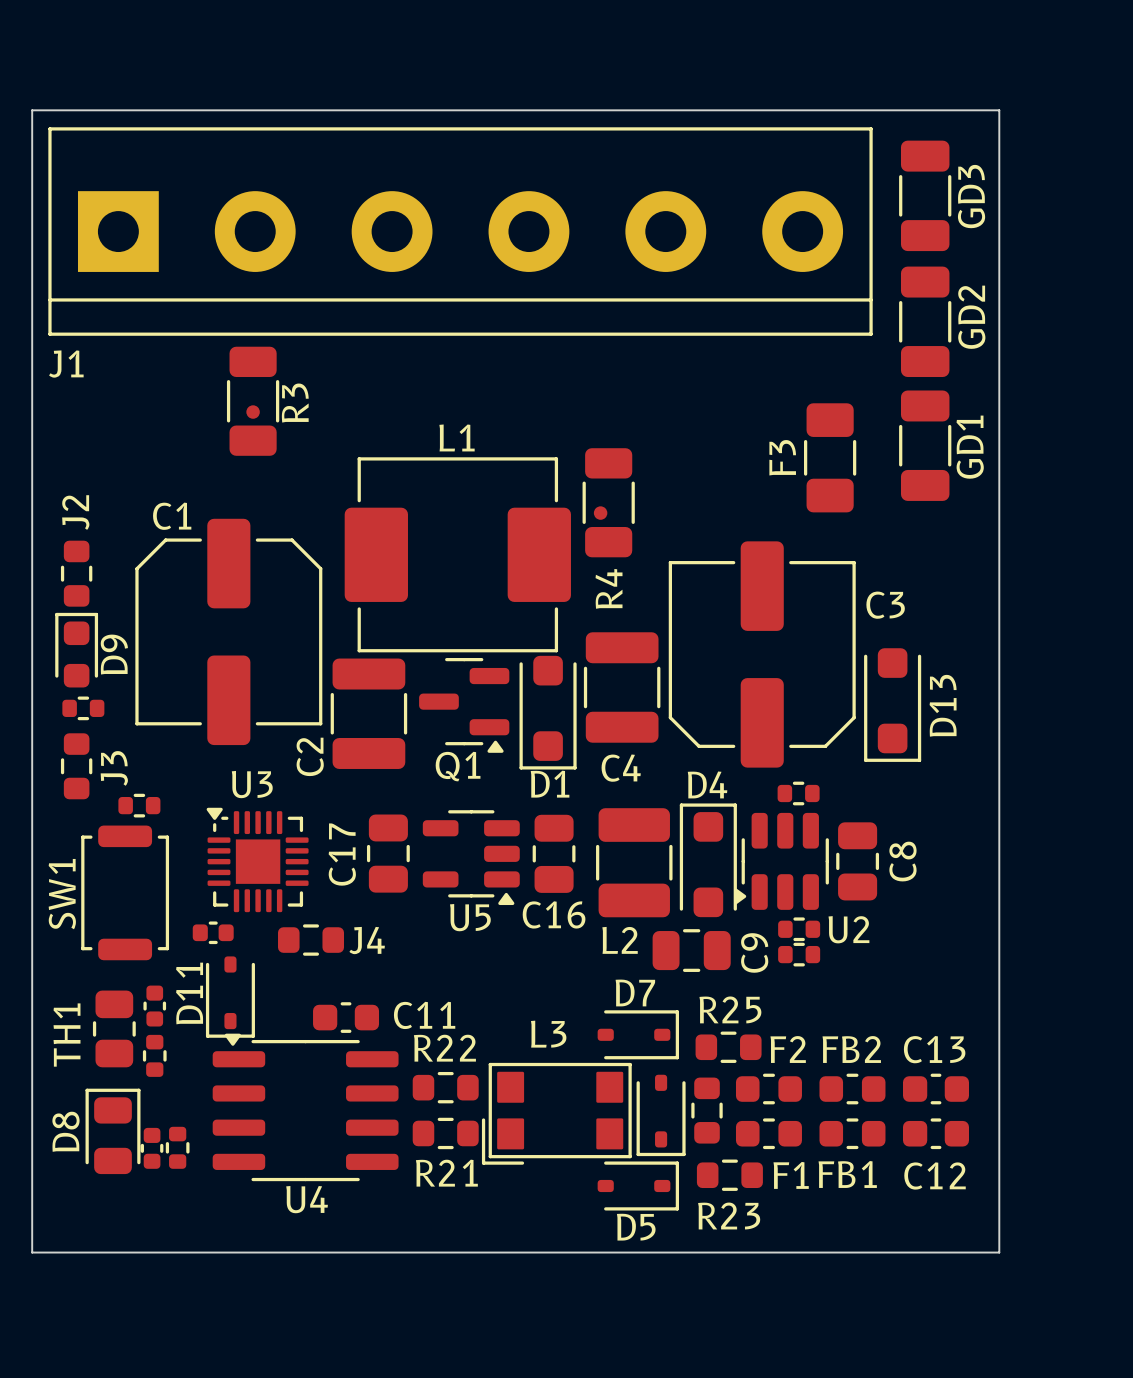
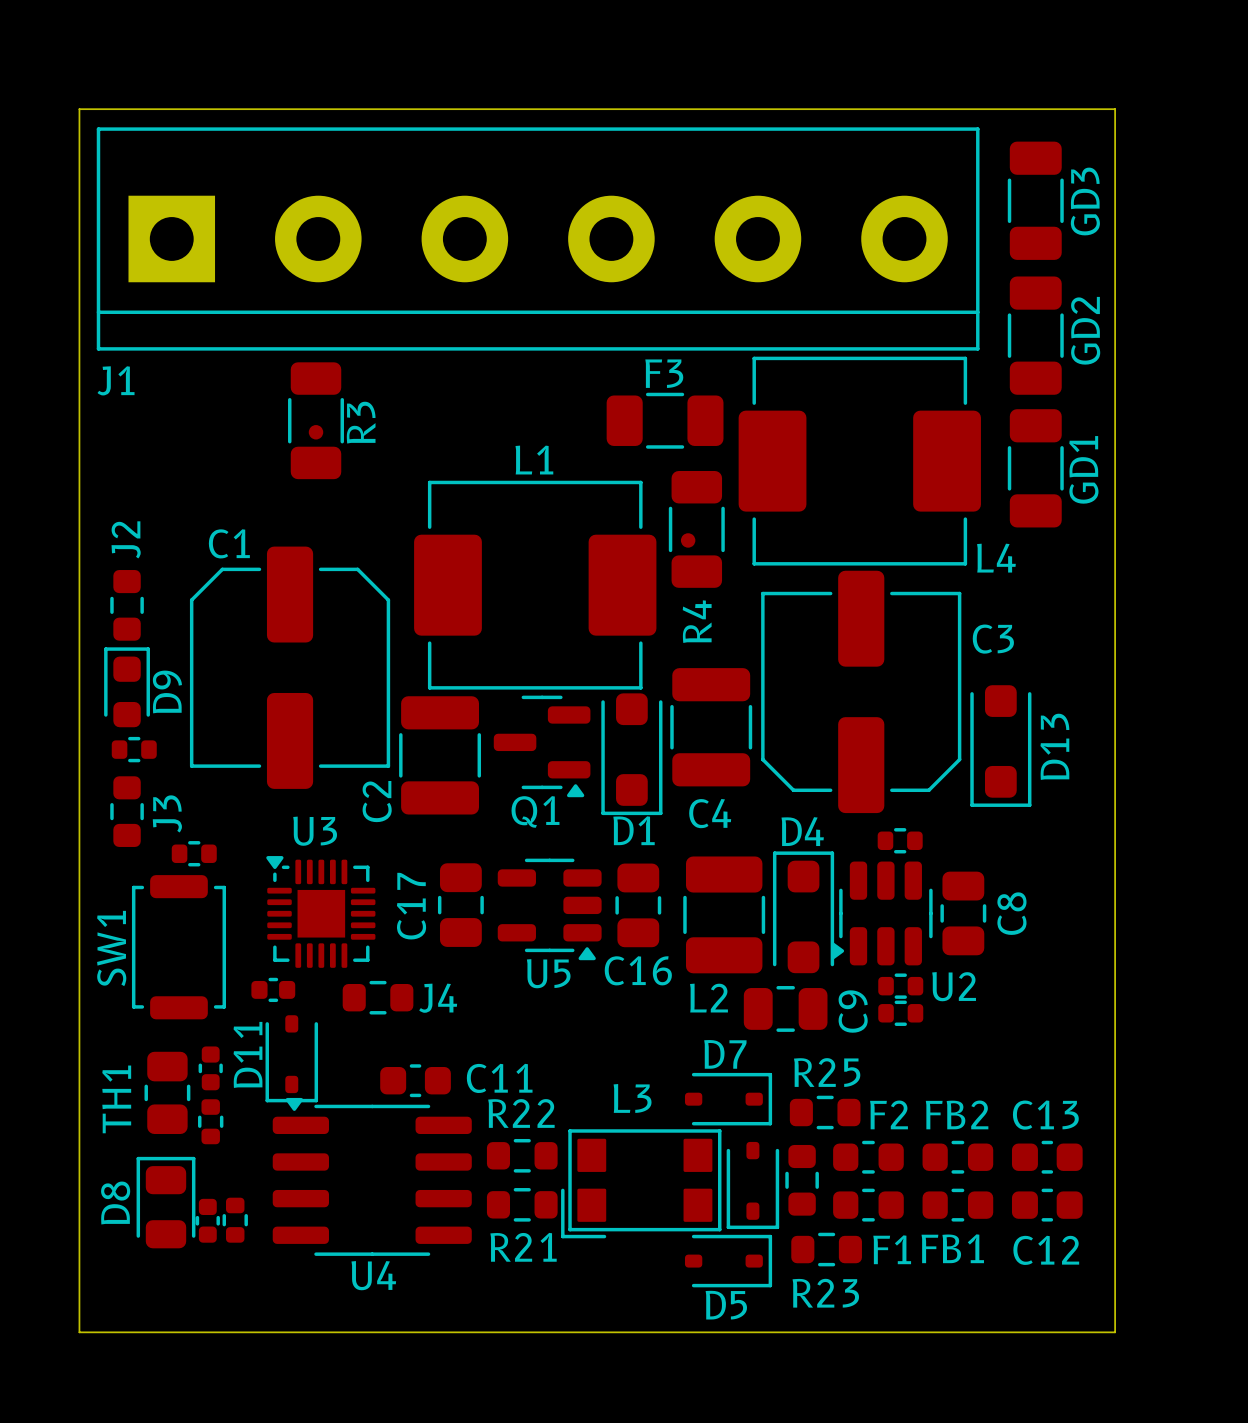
L4: none -> (859, 461)
F3 rotation: 0° (830, 457) -> 90° clockwise (665, 420)
F3 position: (830, 457) -> (665, 420)

